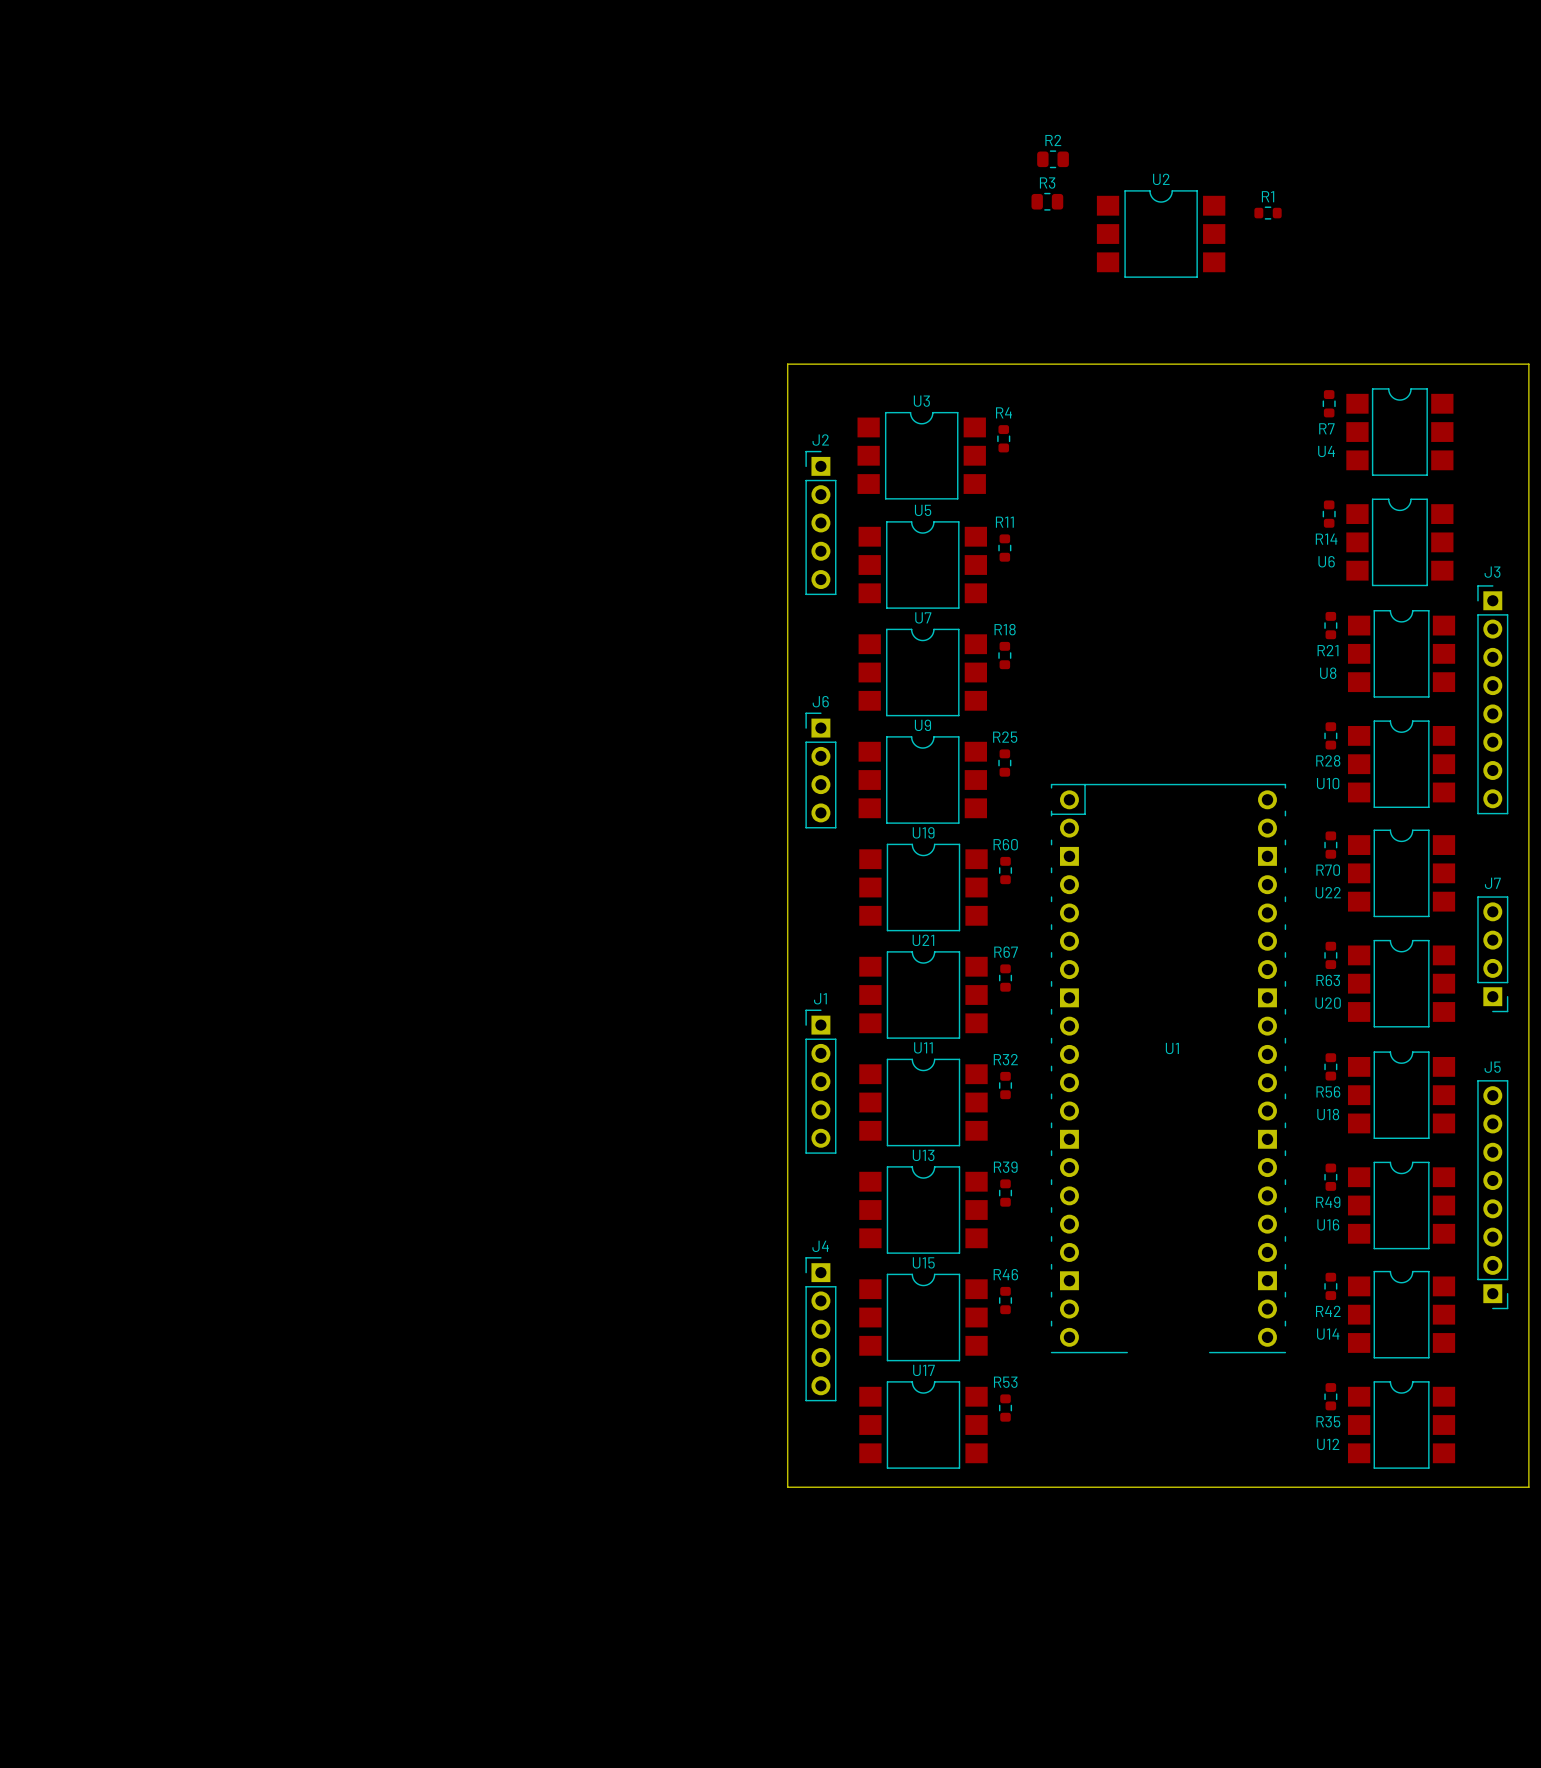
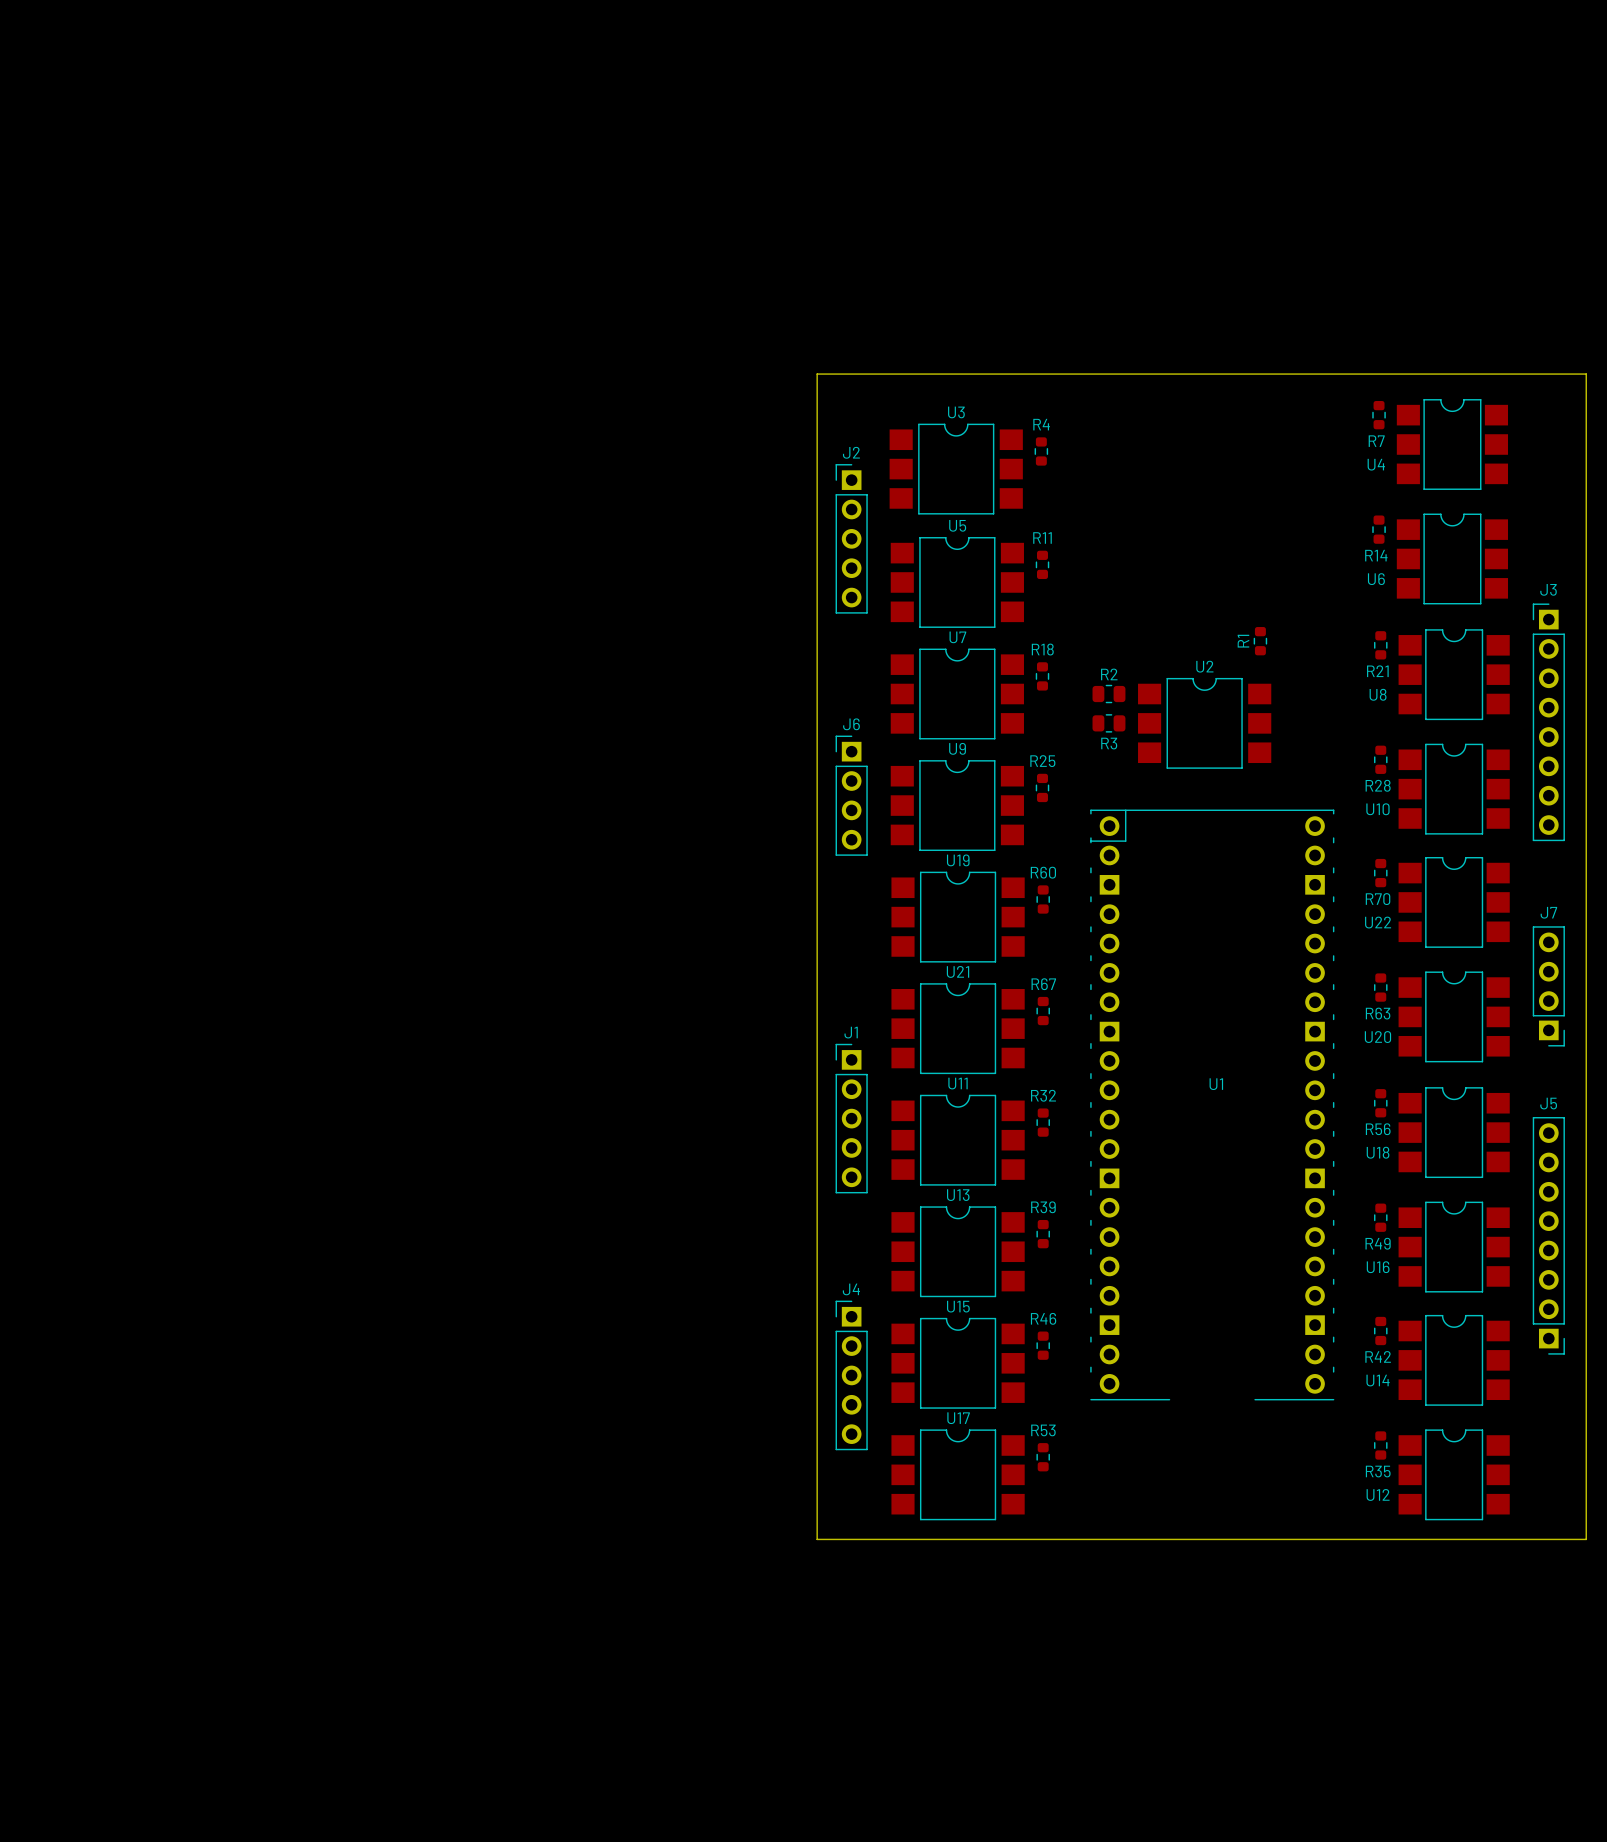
R2 position: (1053, 159) -> (1108, 694)
R3 name position: R3 (1047, 183) -> R3 (1109, 743)
R1 name position: R1 (1268, 196) -> R1 (1243, 641)
R3 position: (1047, 201) -> (1108, 723)
R1 rotation: 0° (1268, 213) -> 90° clockwise (1260, 641)
R1 position: (1268, 213) -> (1260, 641)
U2 position: (1161, 234) -> (1204, 723)

